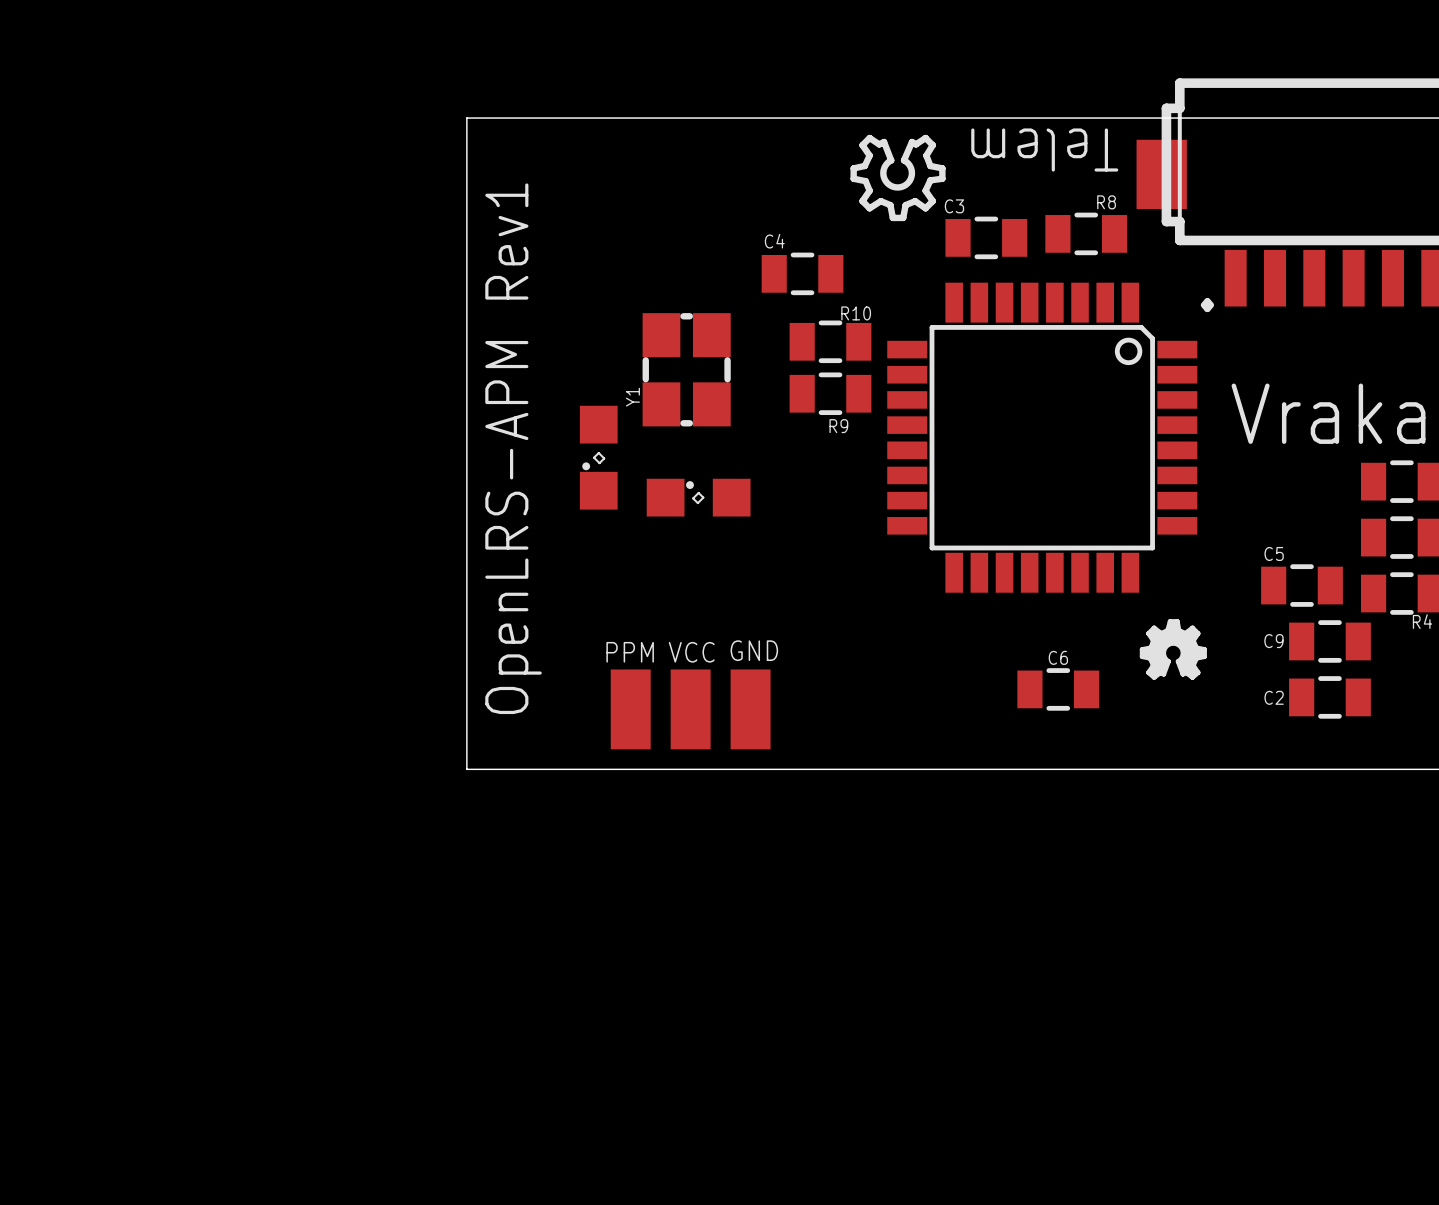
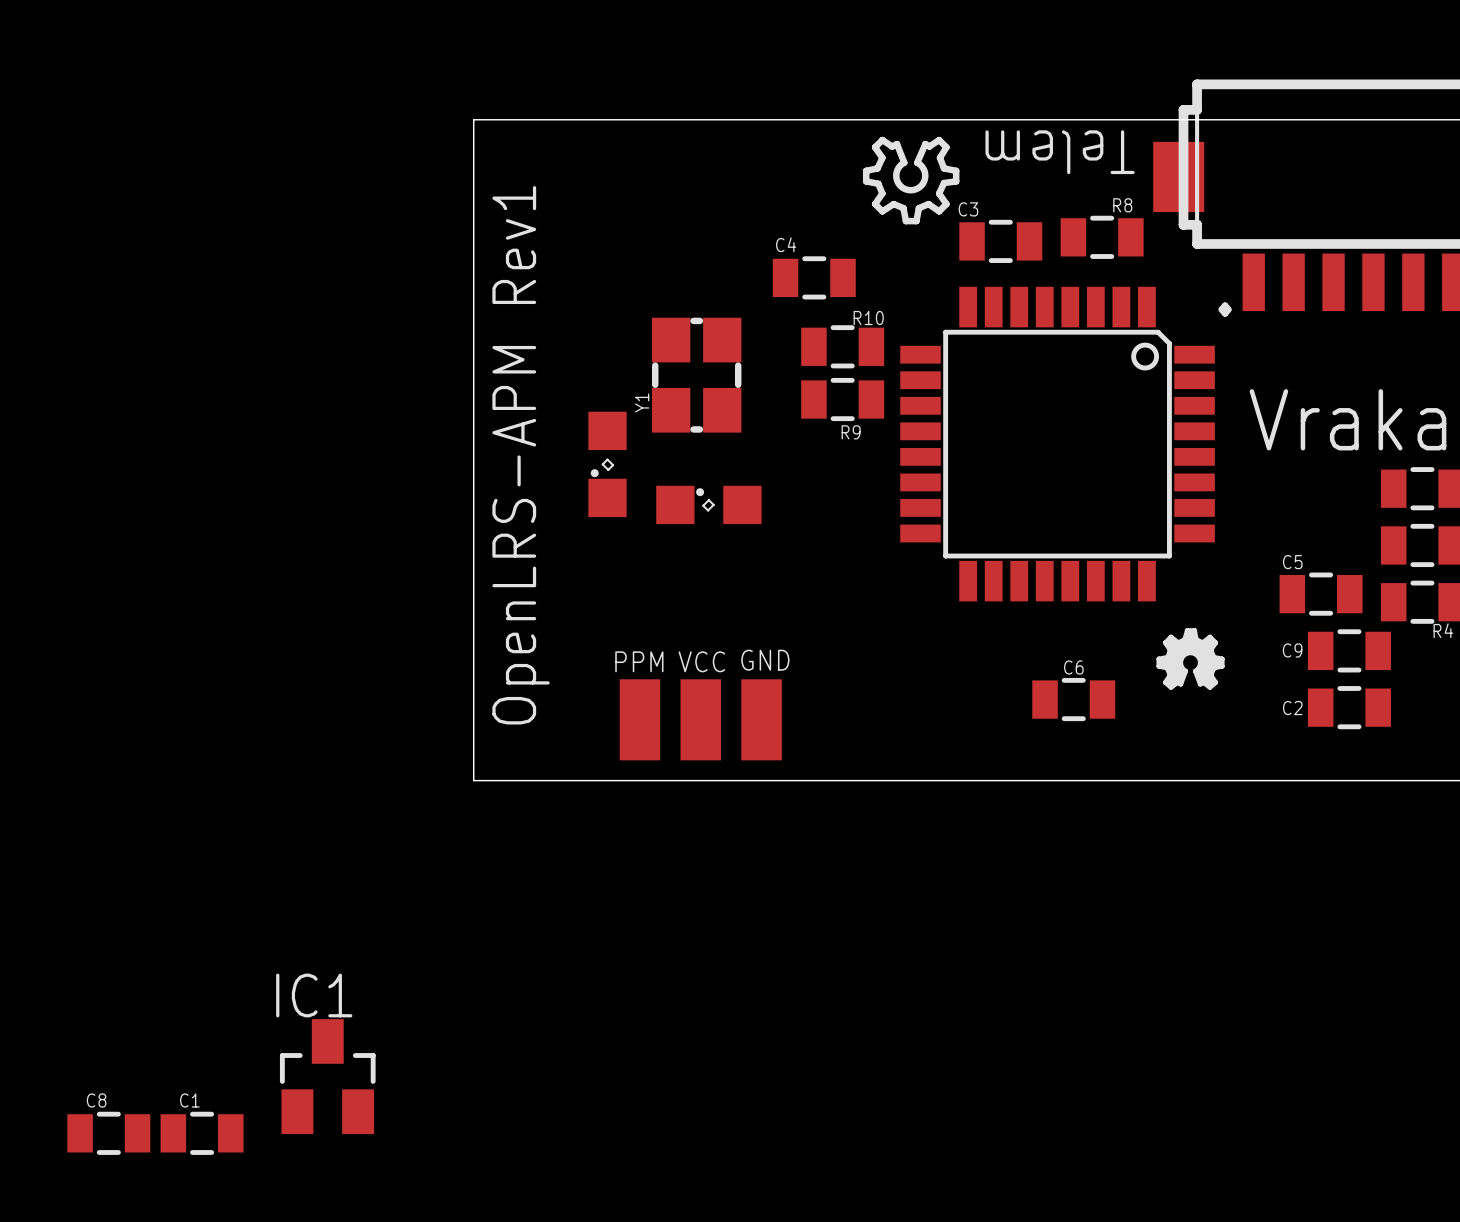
IC1: none -> (327, 1076)
C8: none -> (108, 1133)
C1: none -> (202, 1133)

